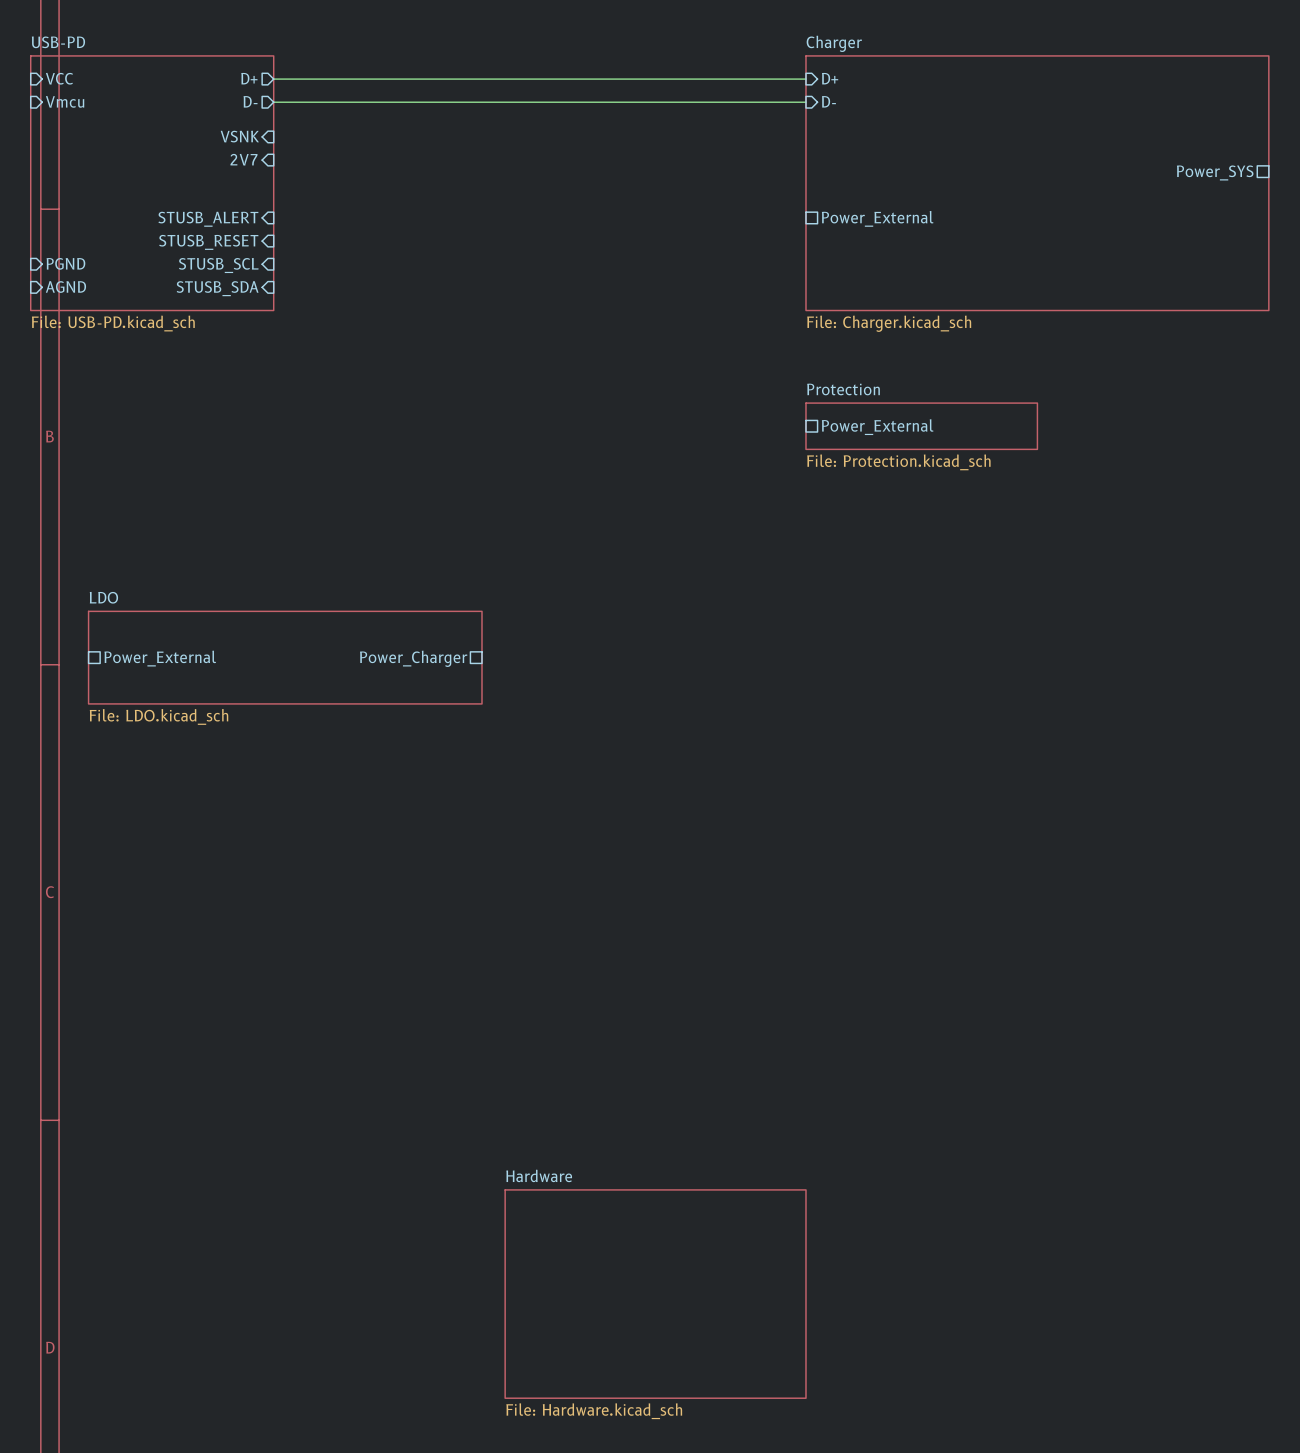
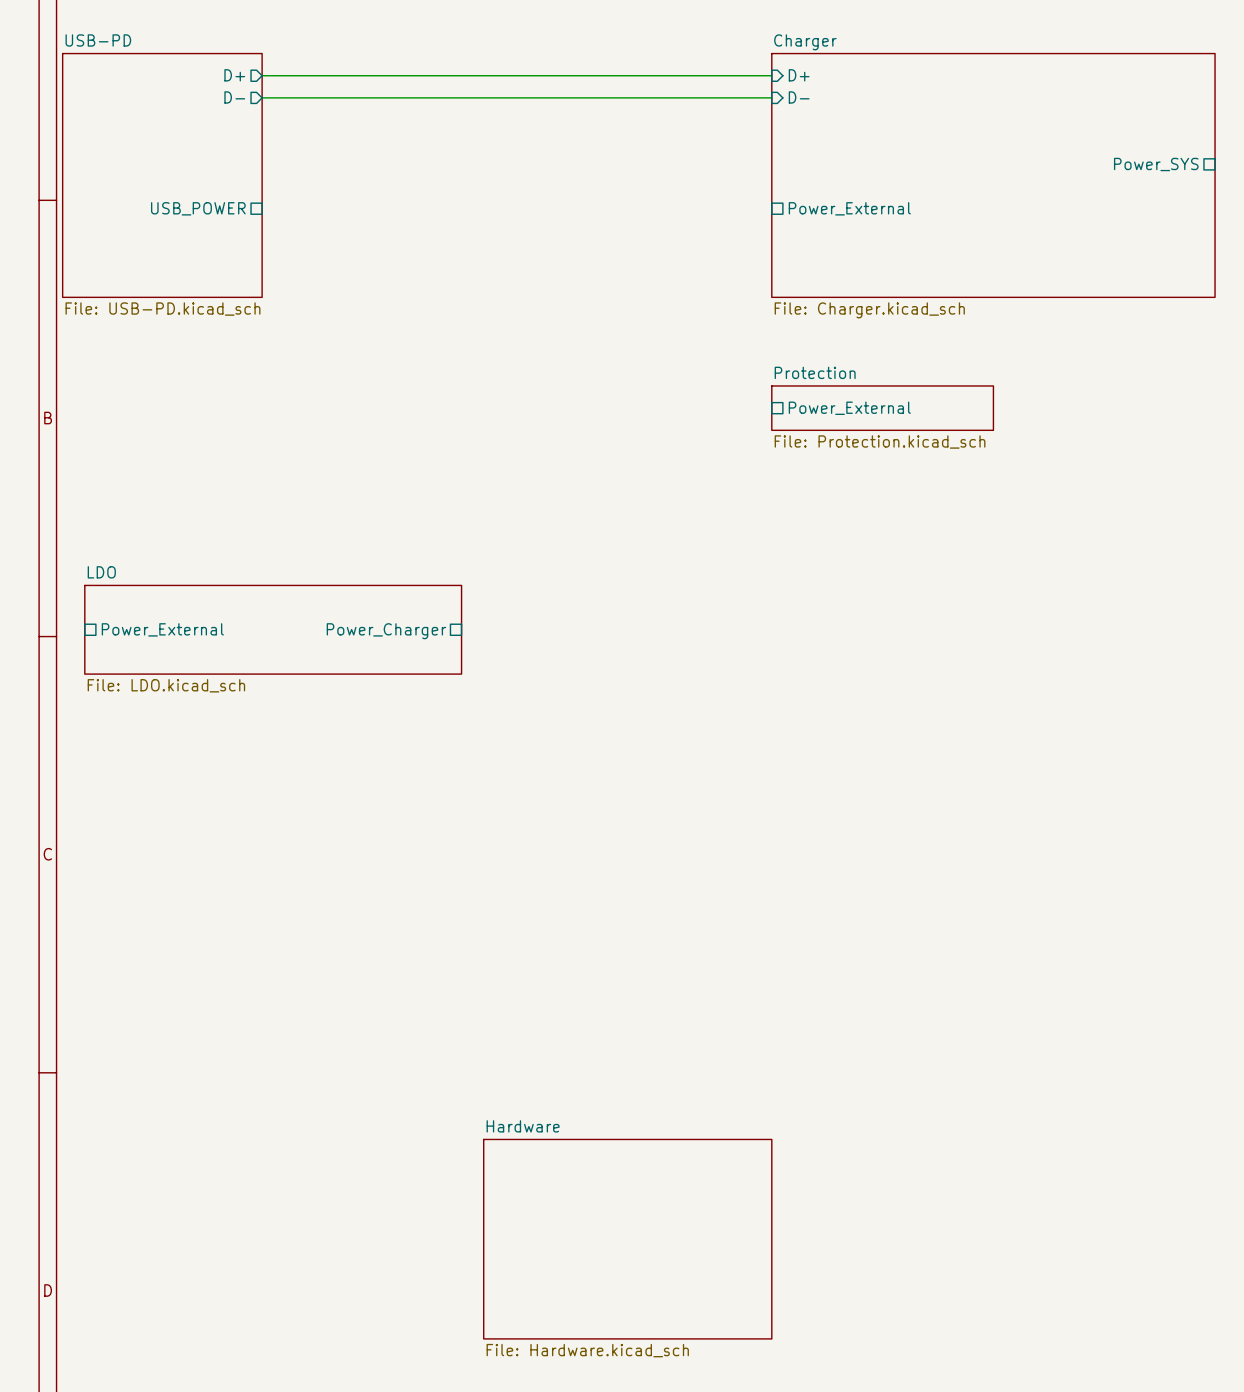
sheet pin: VCC (59, 78) -> none
sheet pin: Vmcu (65, 101) -> none
sheet pin: VSNK (239, 136) -> none
sheet pin: 2V7 (243, 159) -> none
sheet USB-PD: File: USB-PD.kicad_sch (152, 183) -> none
sheet USB-PD: none -> File: USB-PD.kicad_sch (162, 175)
sheet pin shape: input (208, 219) -> passive (198, 208)
sheet pin: STUSB_ALERT (208, 219) -> USB_POWER (198, 208)
sheet pin: STUSB_RESET (208, 242) -> none
sheet pin: PGND (65, 263) -> none
sheet pin: STUSB_SCL (218, 265) -> none
sheet pin: AGND (65, 287) -> none
sheet pin: STUSB_SDA (217, 288) -> none

